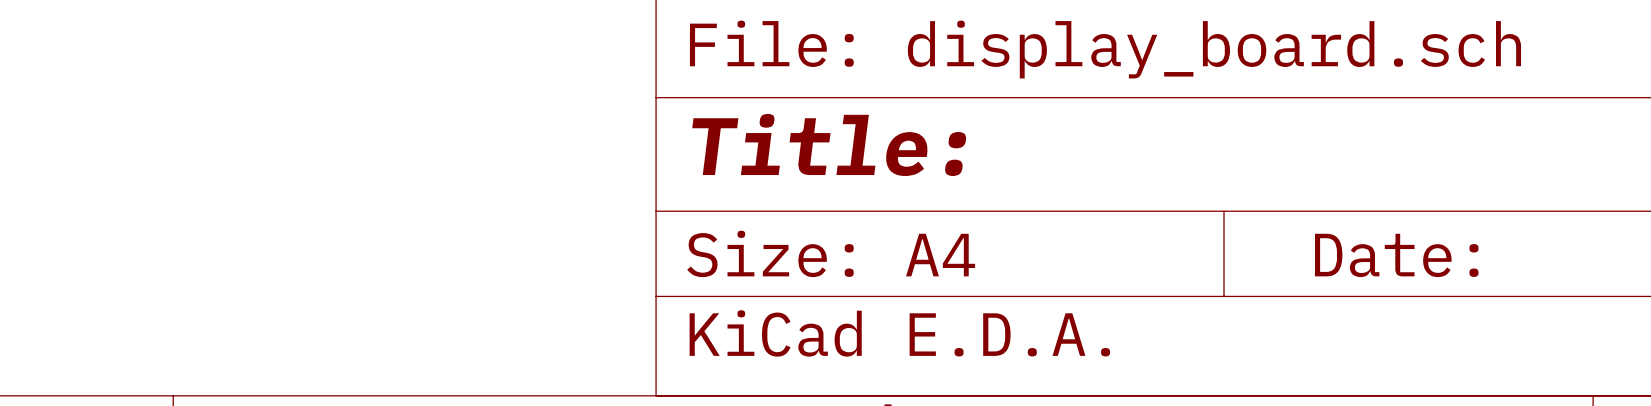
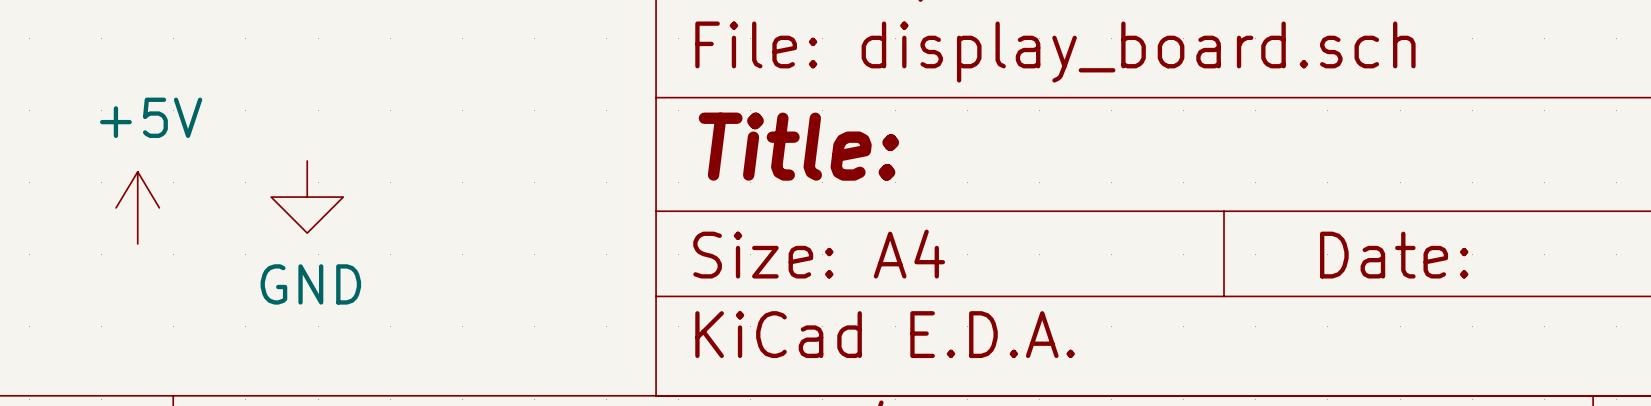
power symbol: none -> GND (307, 197)
power symbol: none -> +5V (137, 207)

